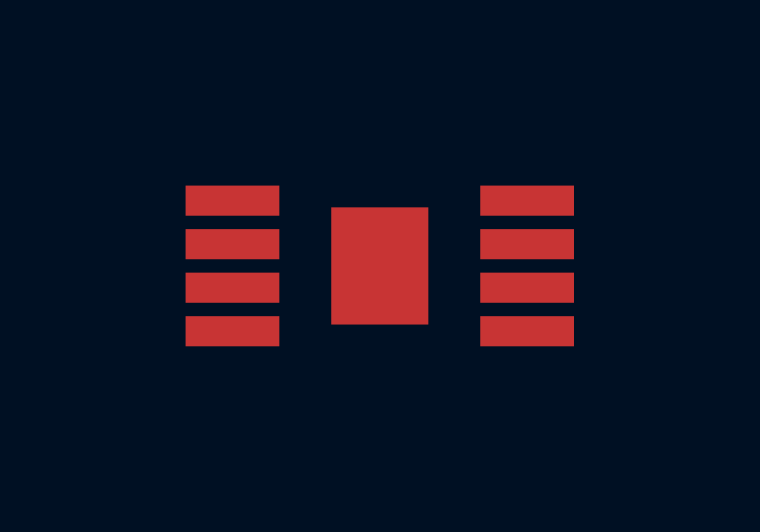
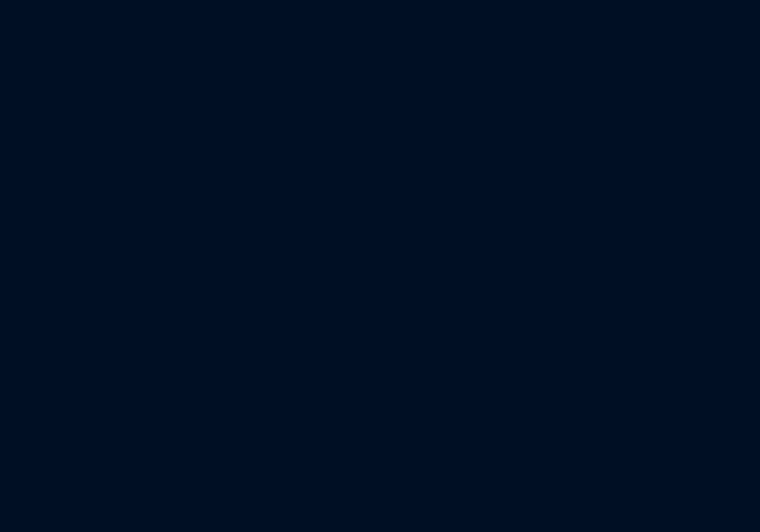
part: (379, 265) -> none

